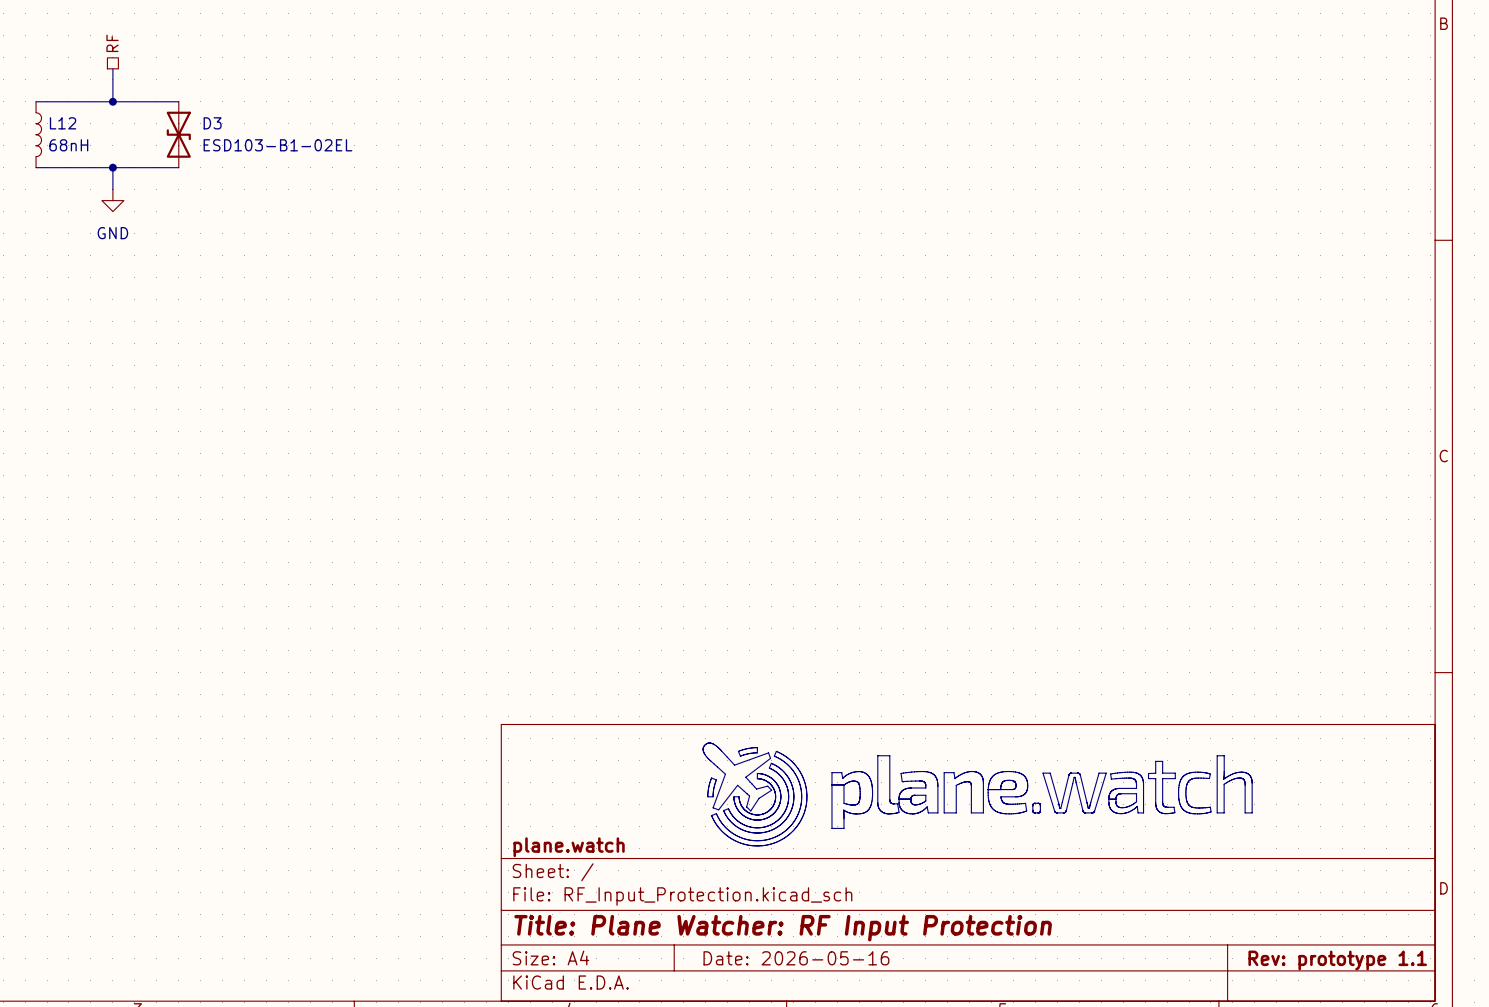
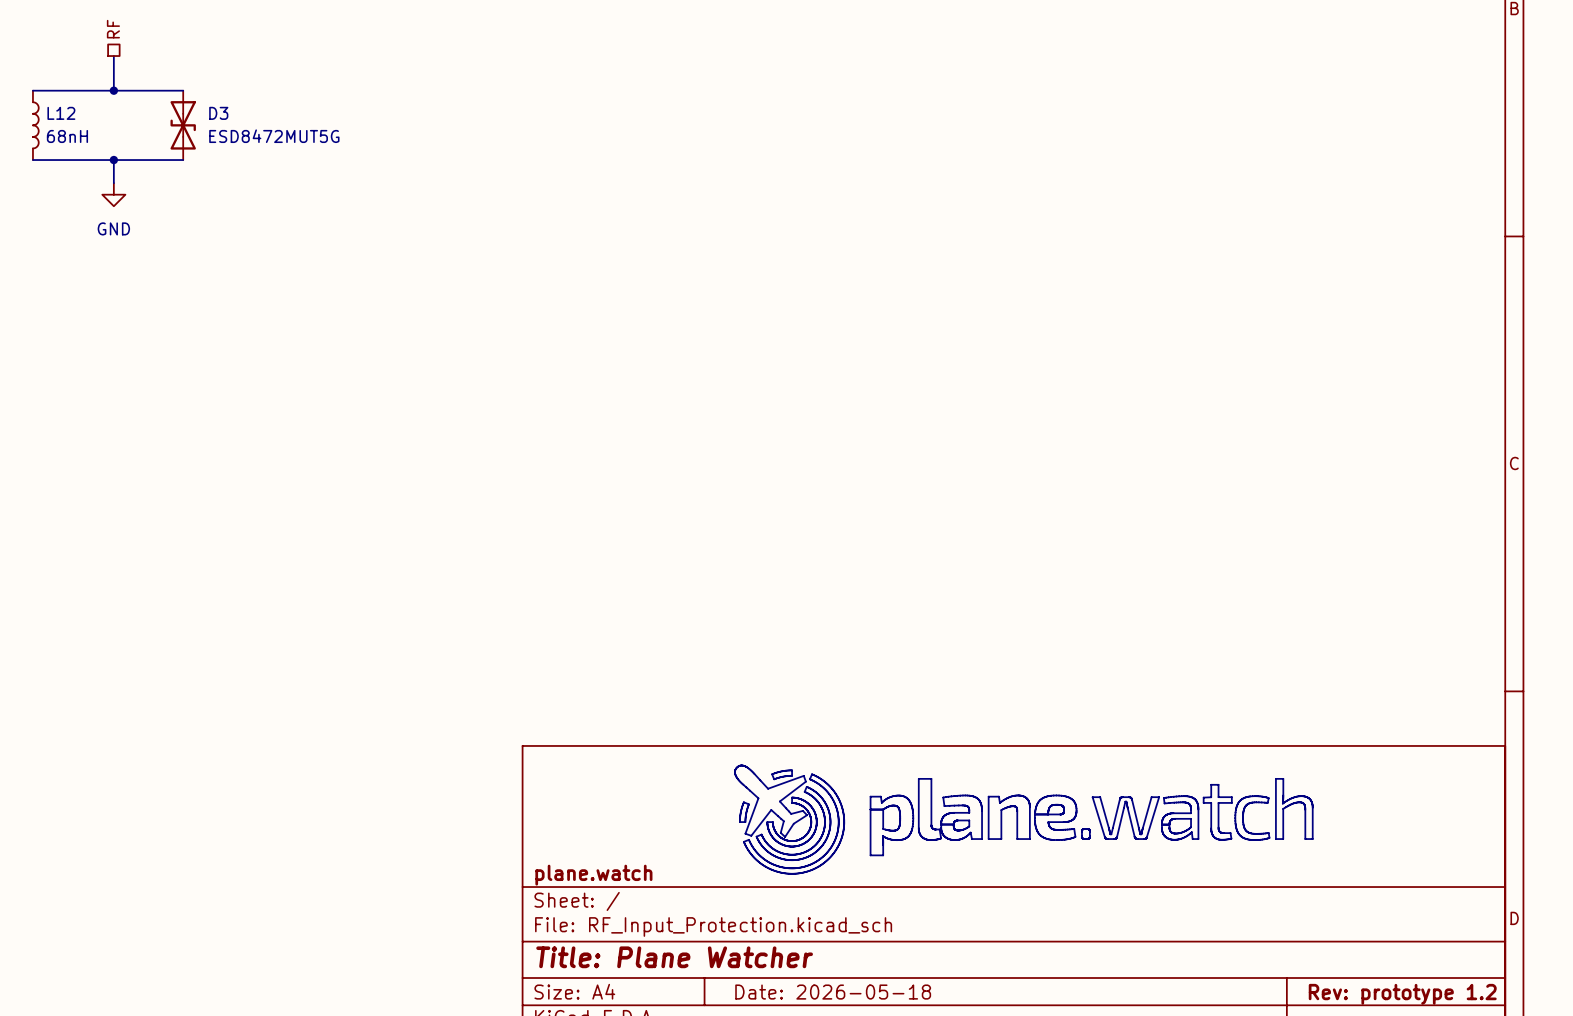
D3 value: ESD103-B1-02EL (277, 145) -> ESD8472MUT5G (274, 136)
title block: Title: Plane Watcher: RF Input Protection (783, 928) -> Title: Plane Watcher (674, 957)
title block: Date: 2026-05-16 (796, 958) -> Date: 2026-05-18 (833, 992)
title block: Rev: prototype 1.1 (1337, 960) -> Rev: prototype 1.2 (1402, 994)

